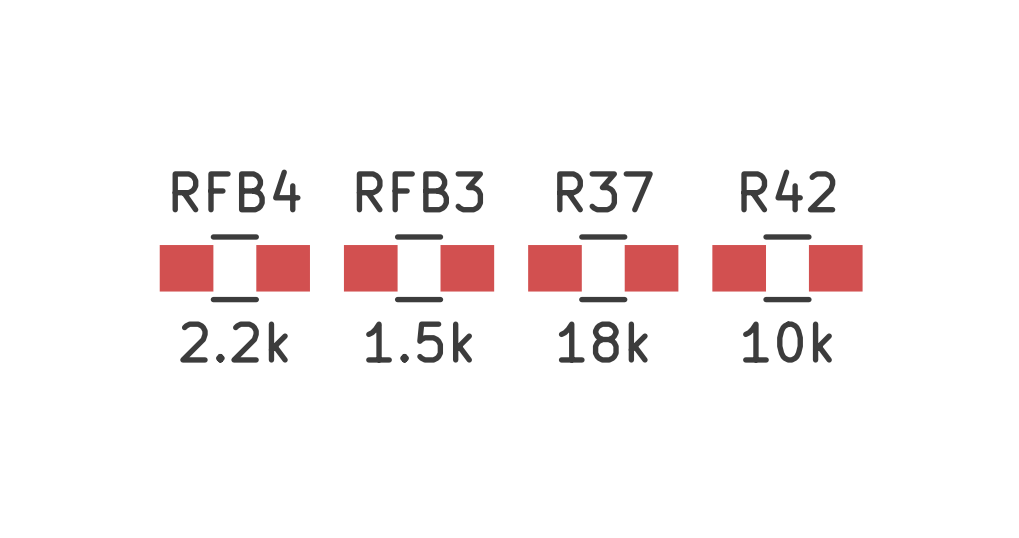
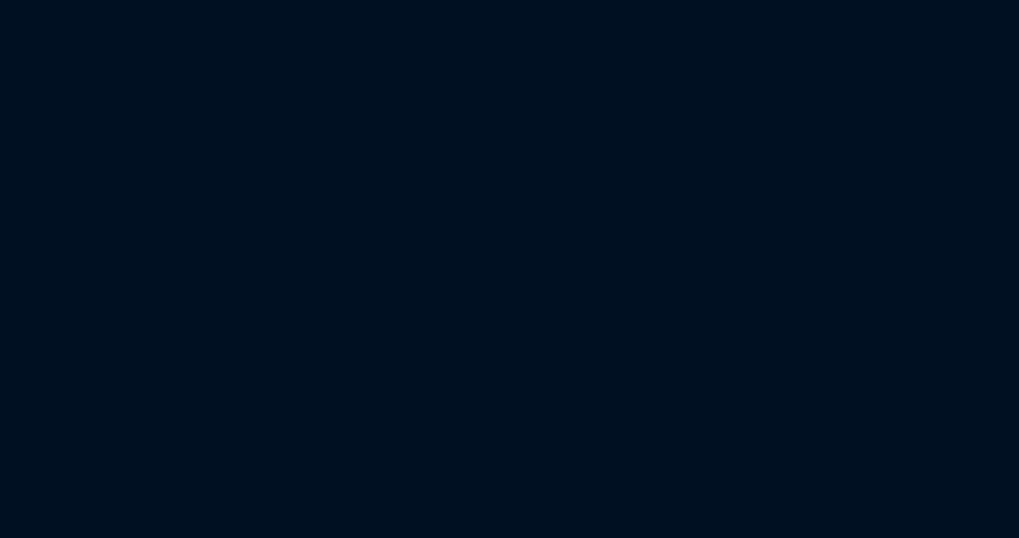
RFB4: 2.2k (234, 268) -> none
RFB3: 1.5k (419, 268) -> none
R37: 18k (603, 268) -> none
R42: 10k (787, 268) -> none

